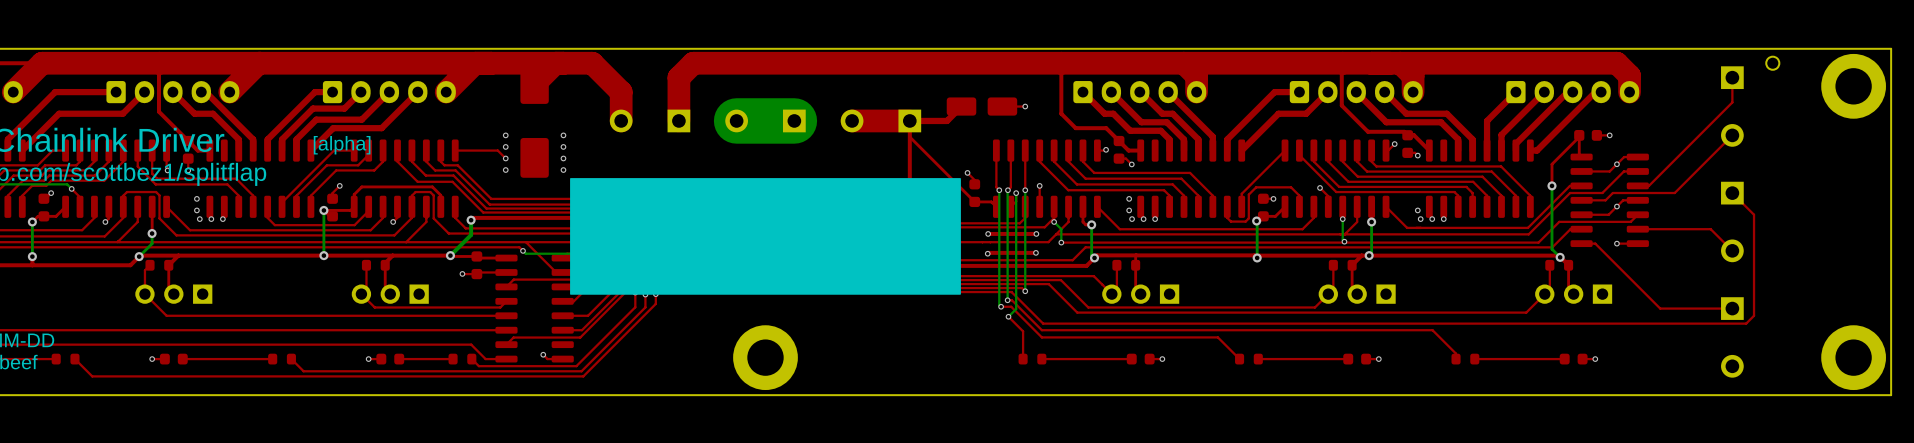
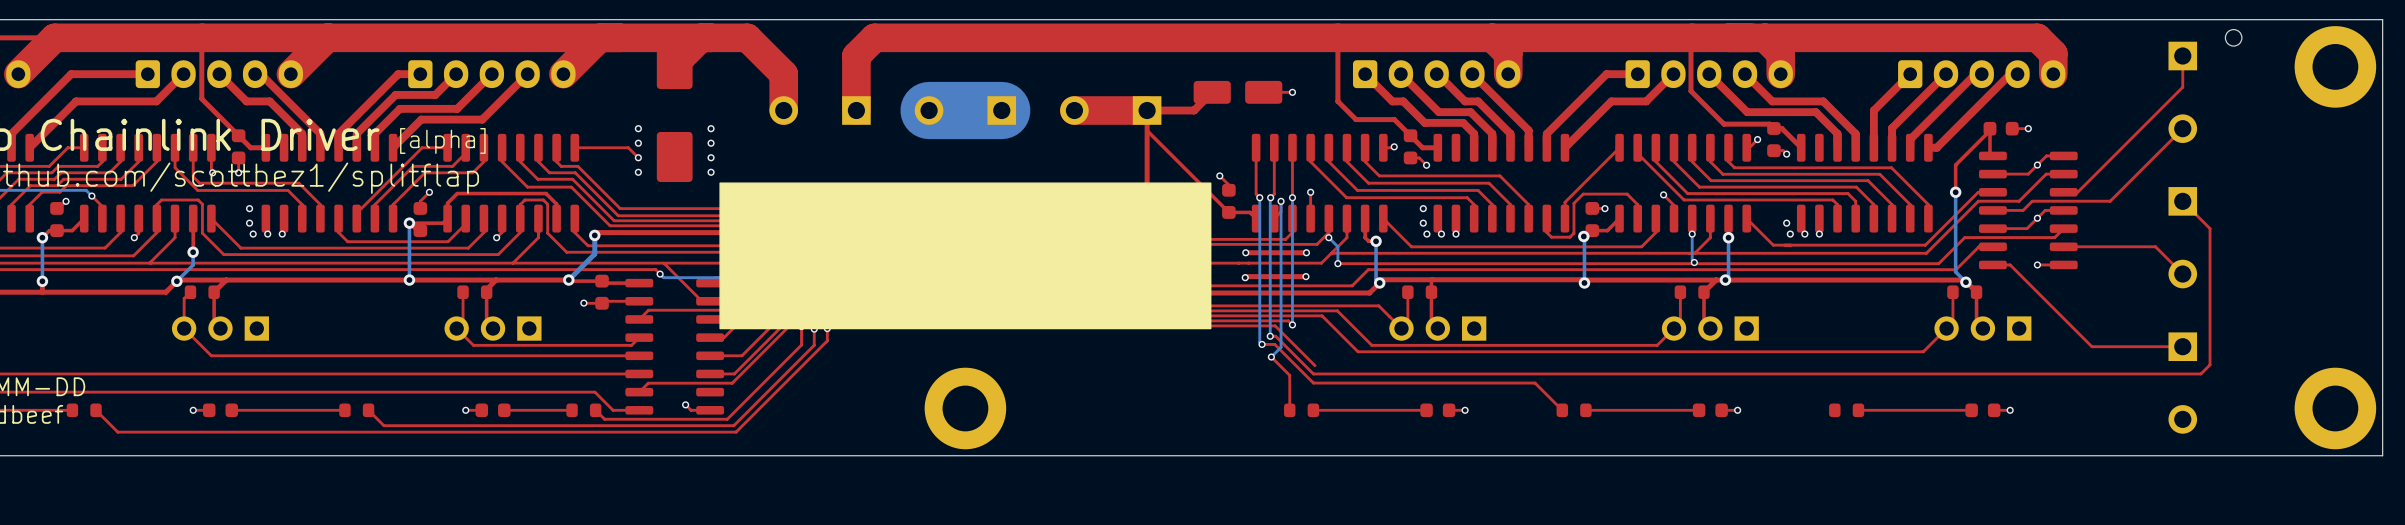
top track: (1754, 315) (1746, 323) (1043, 323) -> none
top track: (1432, 330) (1456, 353) (1456, 359) -> (1805, 373) (2200, 373) (2210, 364) (2210, 355)

